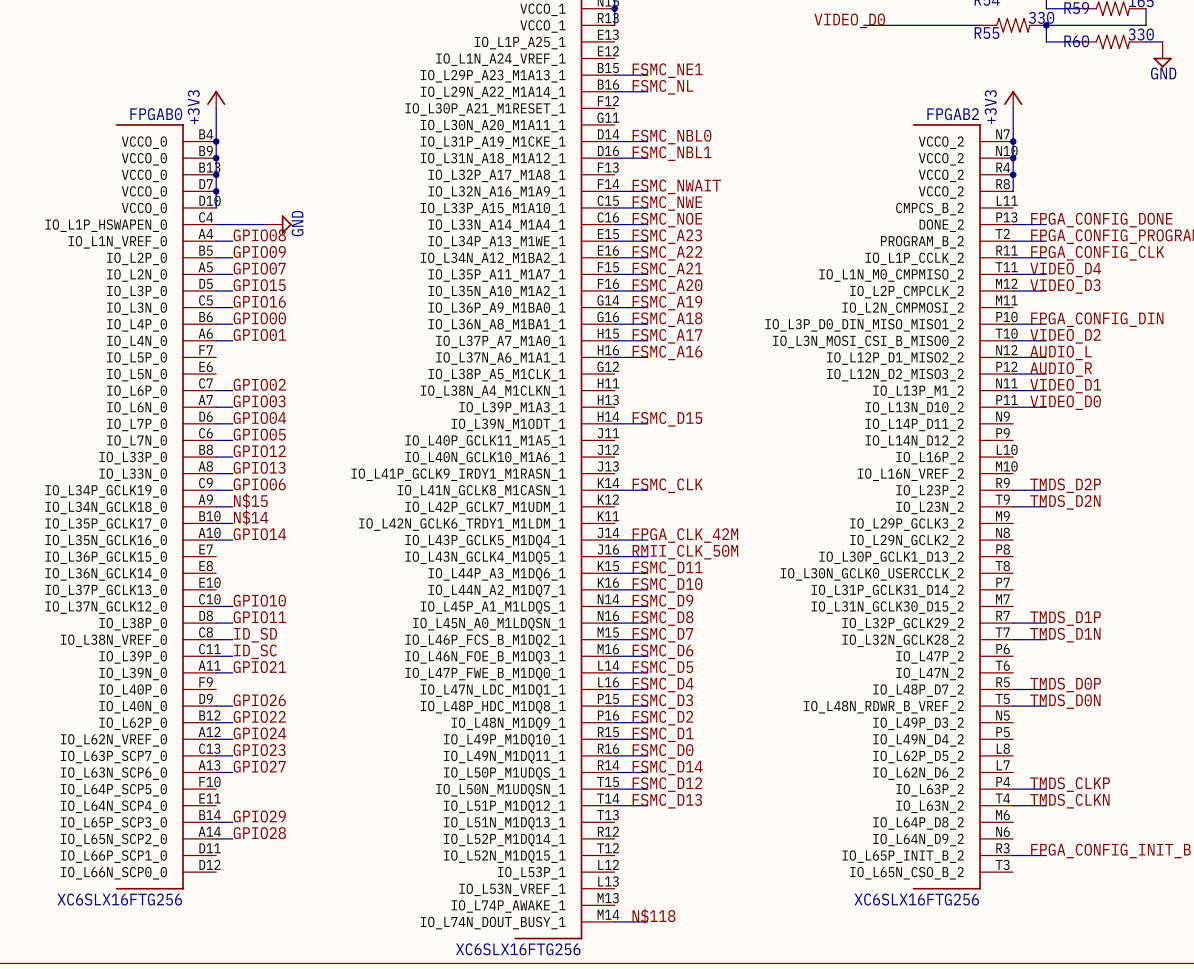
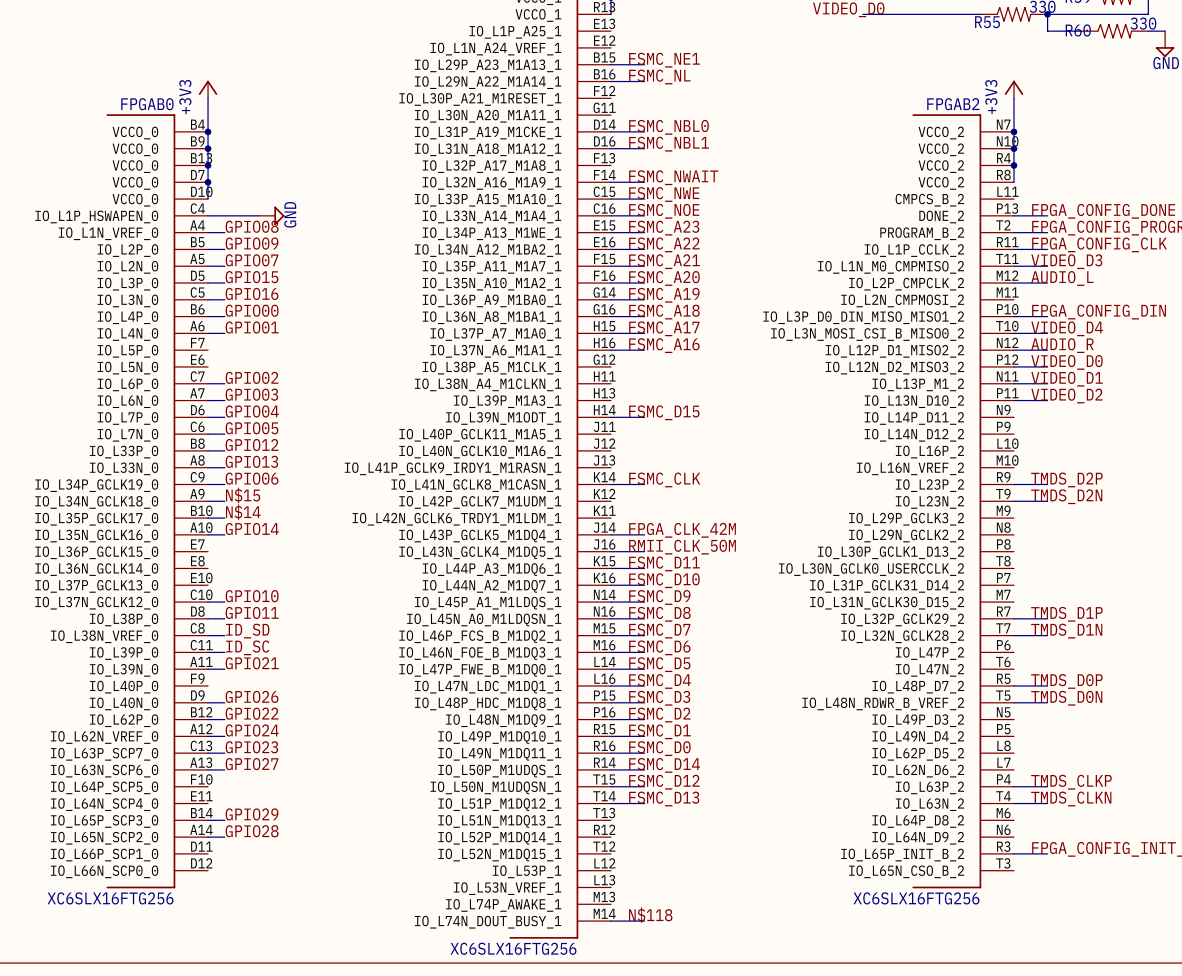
label: VIDEO_D4 (1065, 269) -> VIDEO_D3 (1066, 261)
label: VIDEO_D3 (1065, 286) -> AUDIO_L (1062, 278)
label: VIDEO_D2 (1065, 336) -> VIDEO_D4 (1067, 328)
label: AUDIO_L (1061, 352) -> AUDIO_R (1062, 345)
label: AUDIO_R (1061, 369) -> VIDEO_D0 (1067, 362)
label: VIDEO_D0 (1065, 402) -> VIDEO_D2 (1066, 395)

